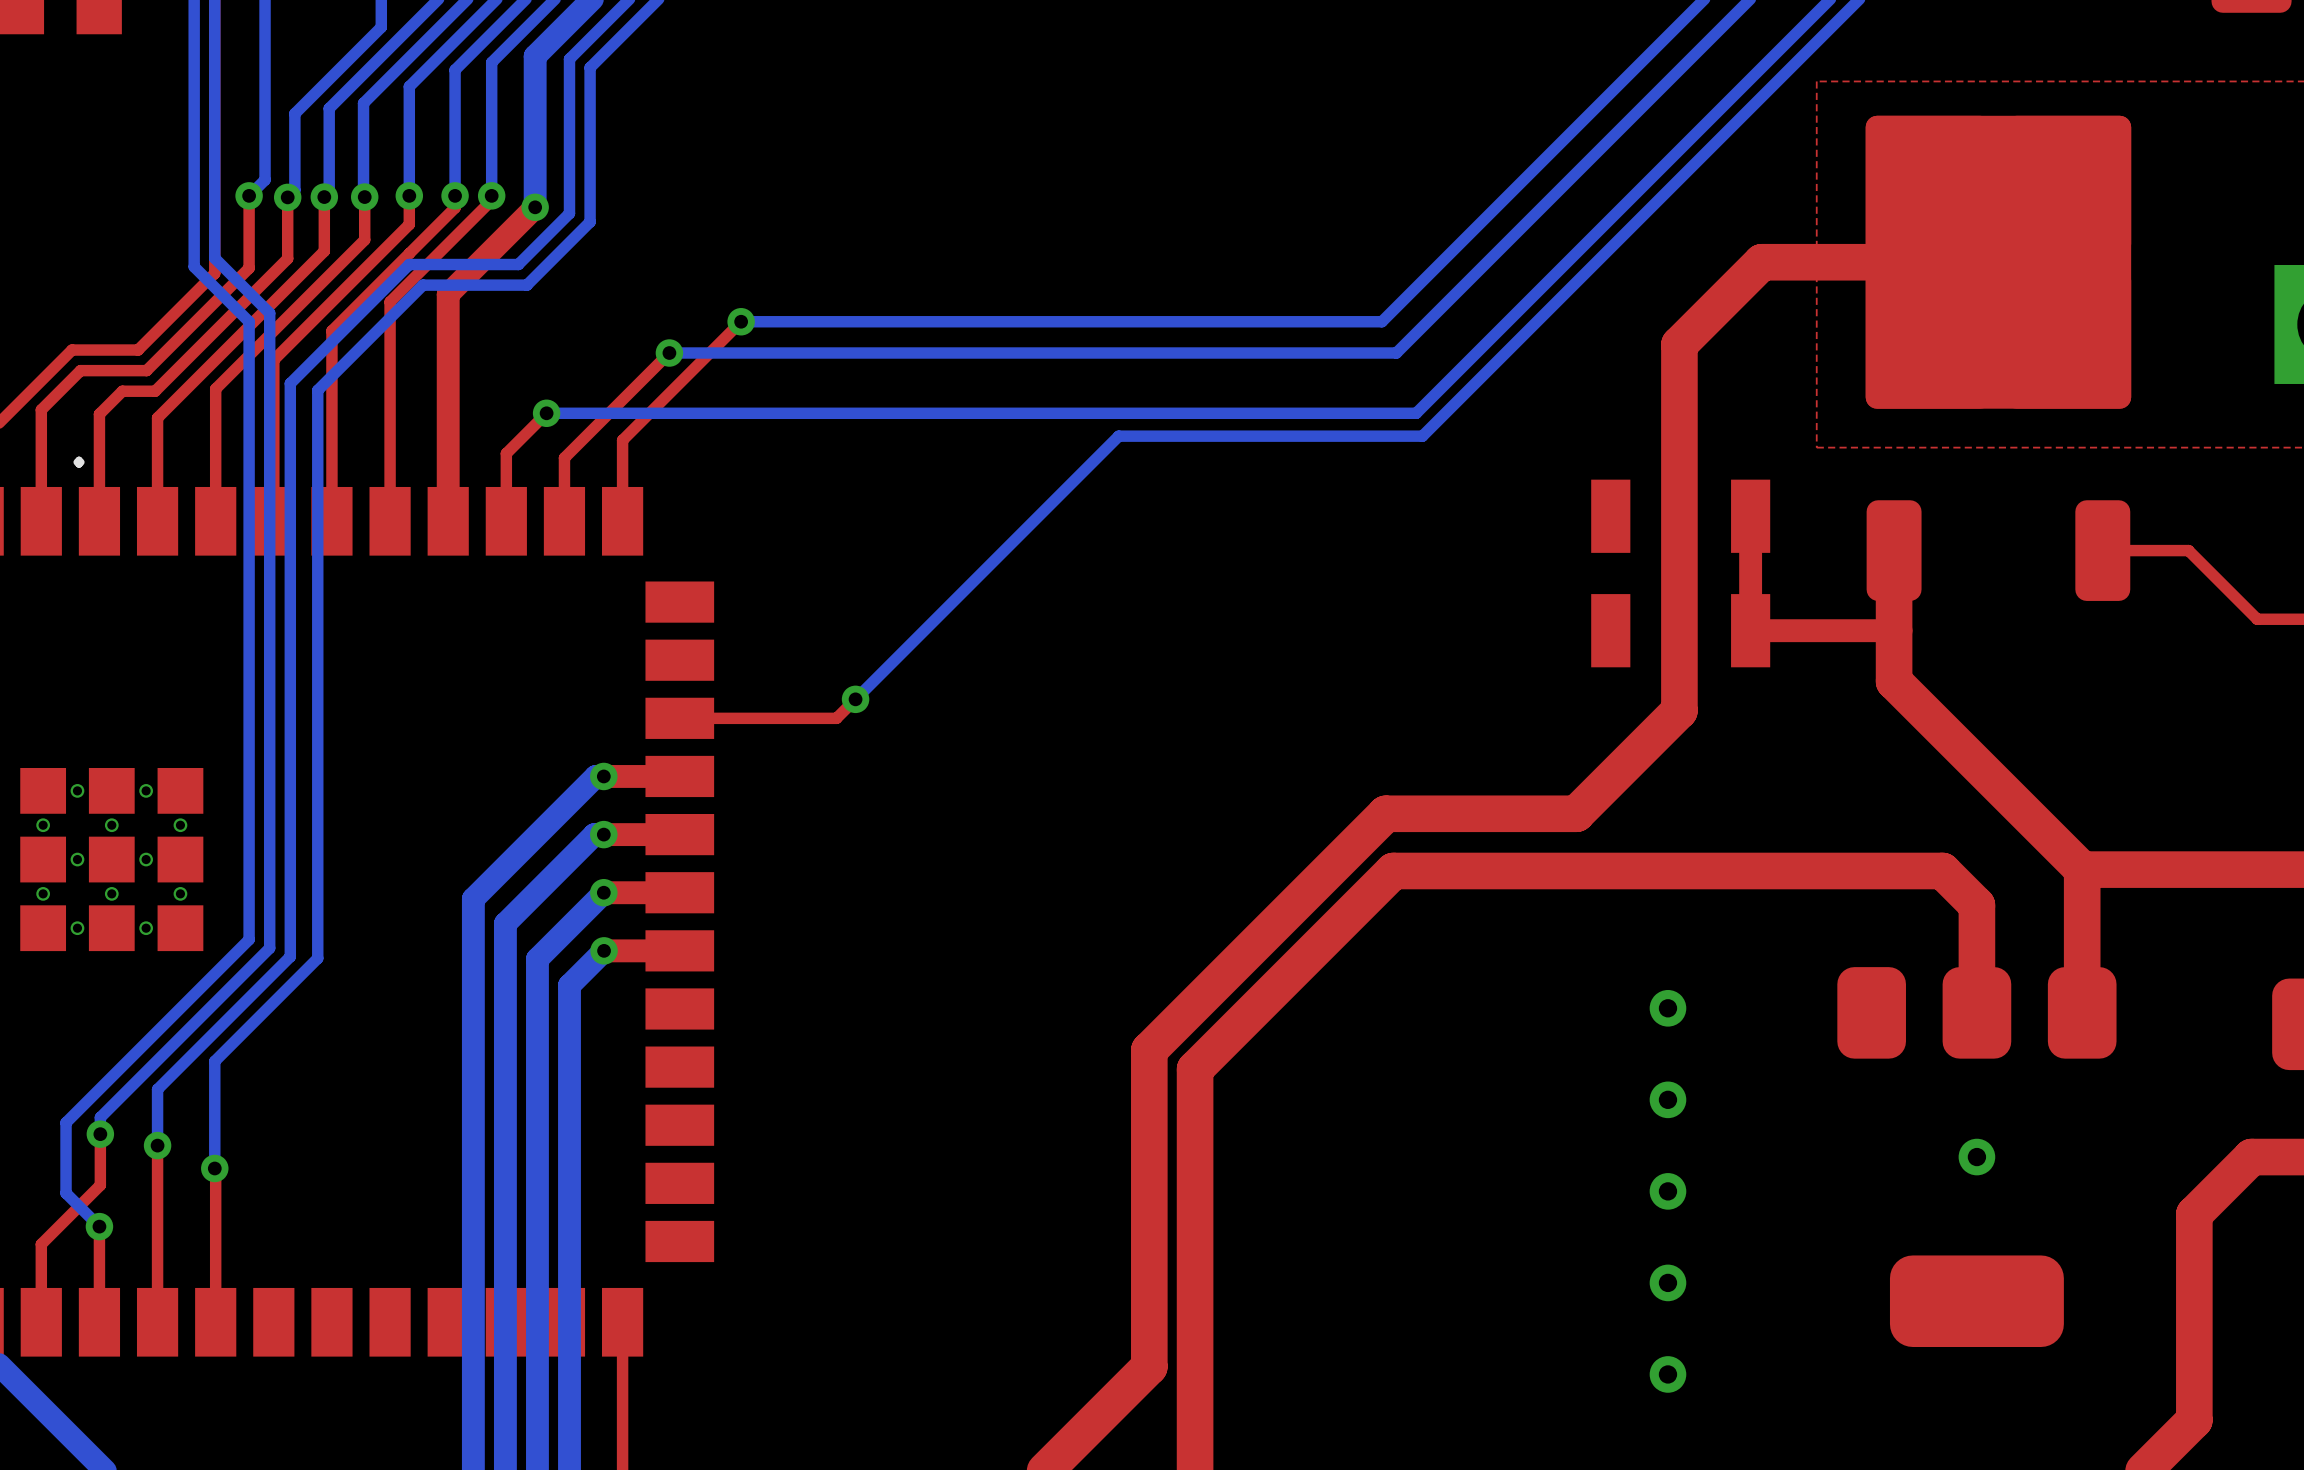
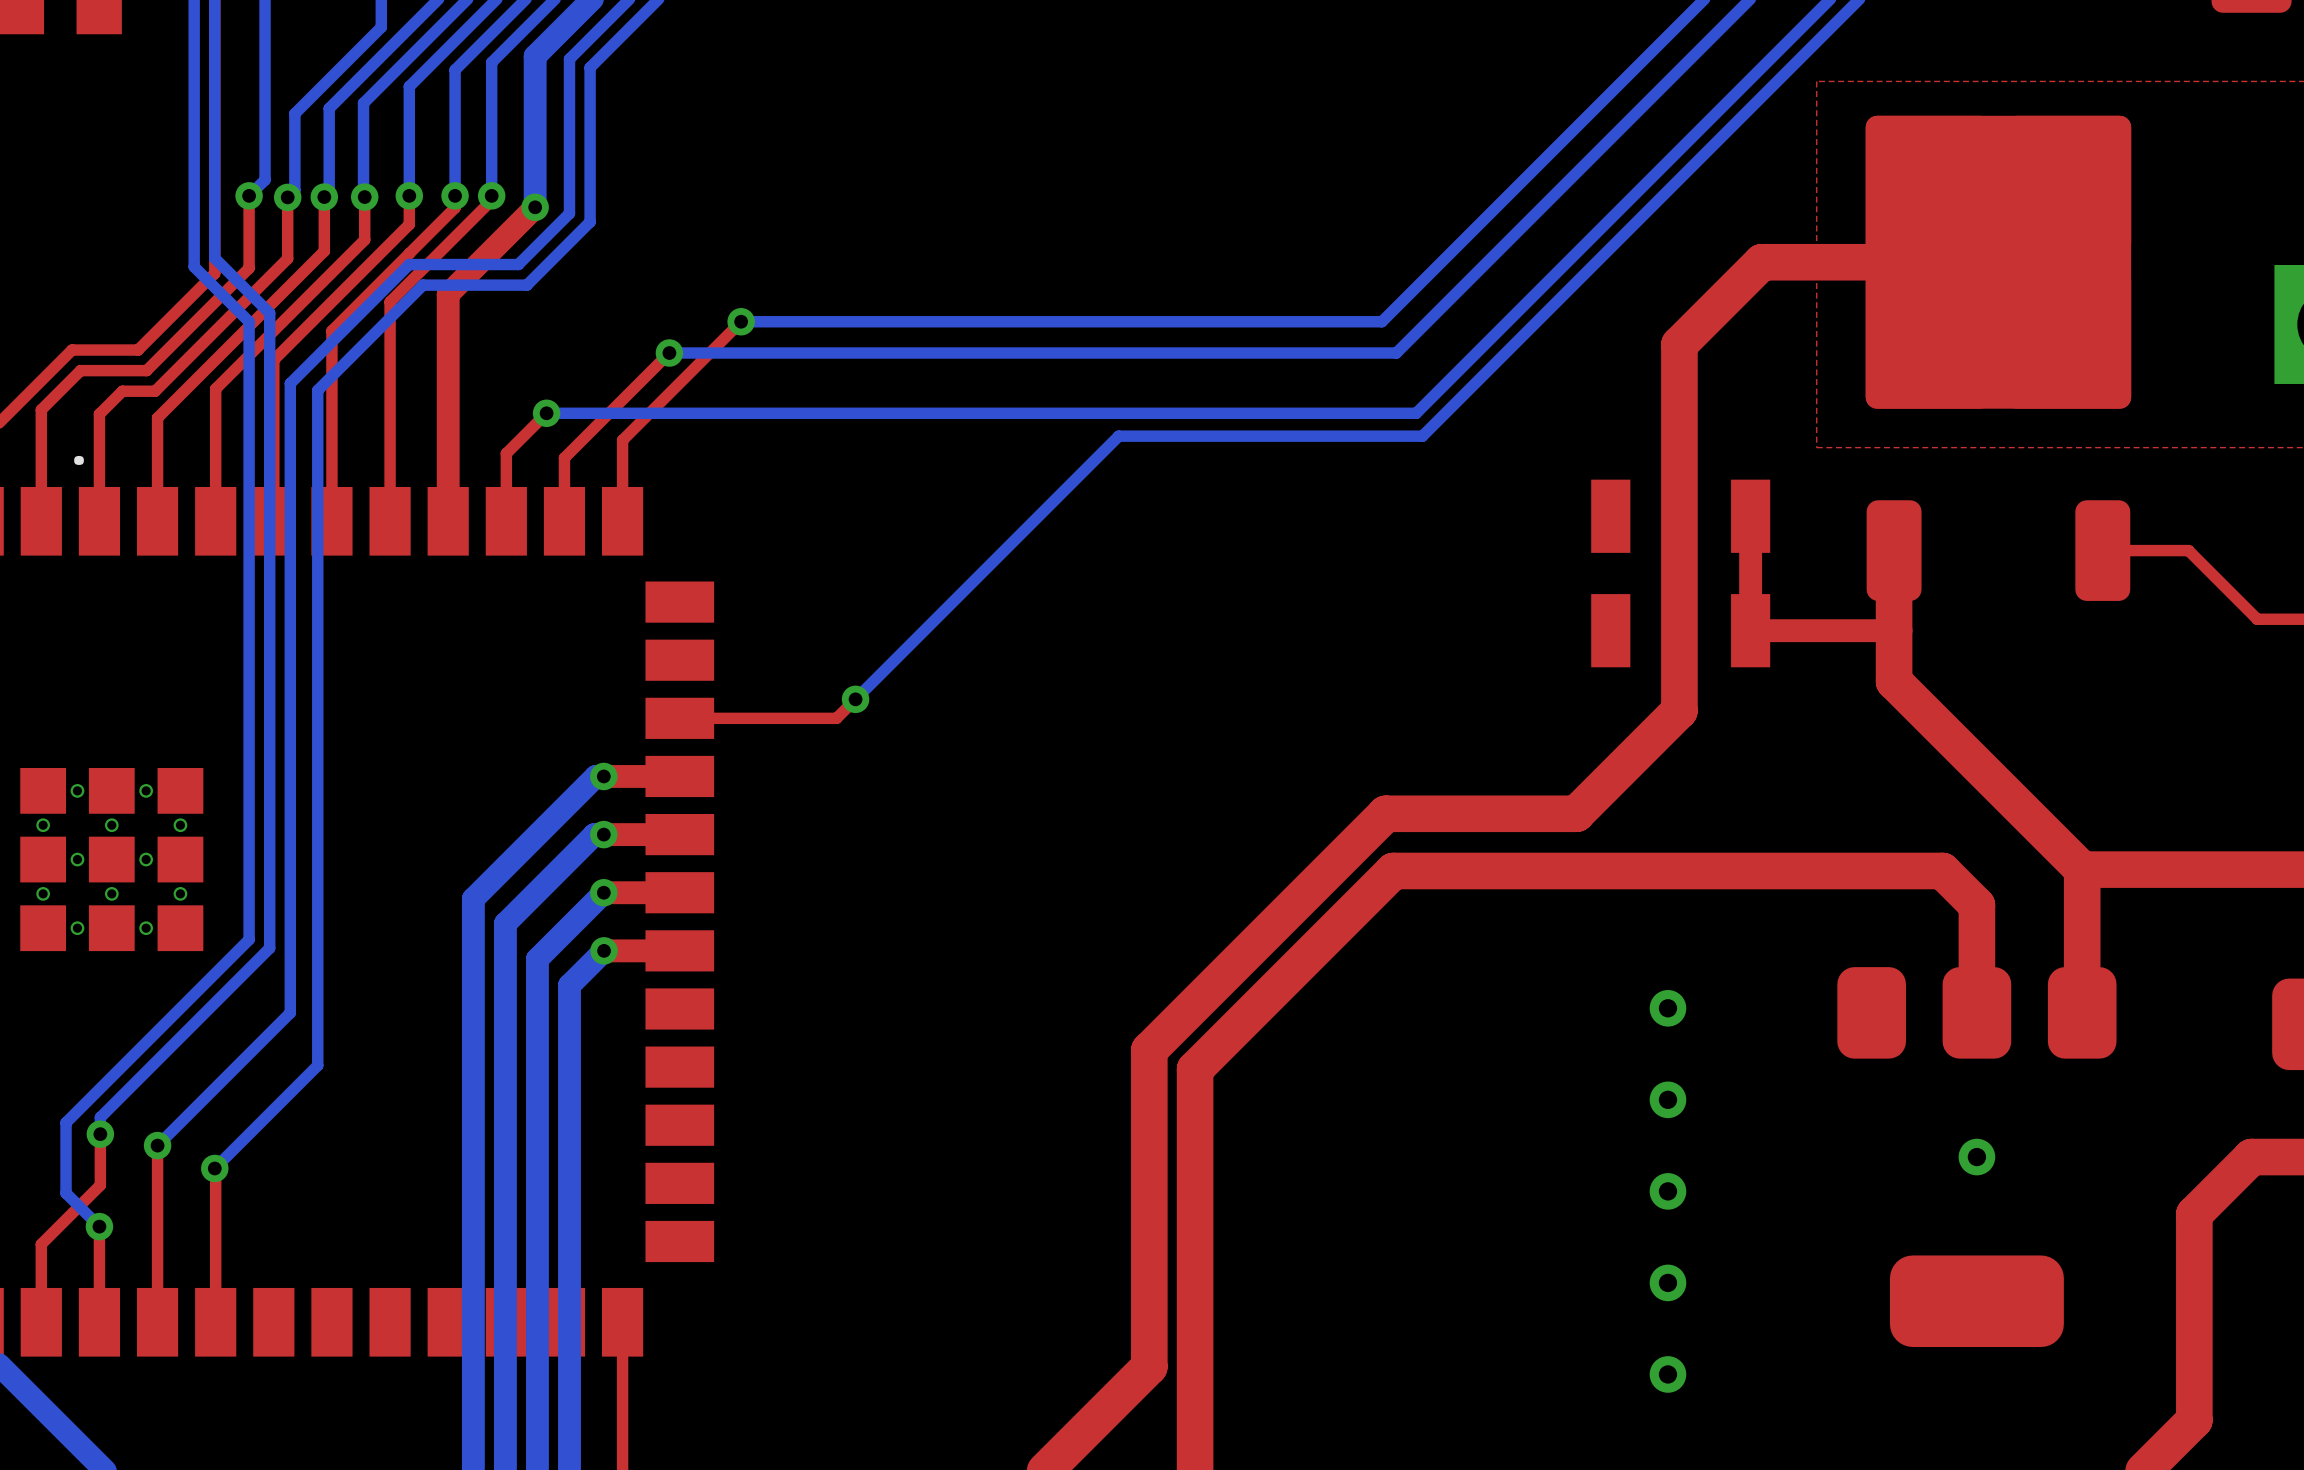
bottom track: (290, 956) (157, 1089) (157, 1145) -> (290, 956) (290, 1012) (157, 1145)
bottom track: (317, 958) (214, 1061) (214, 1168) -> (317, 958) (317, 1065) (214, 1168)

